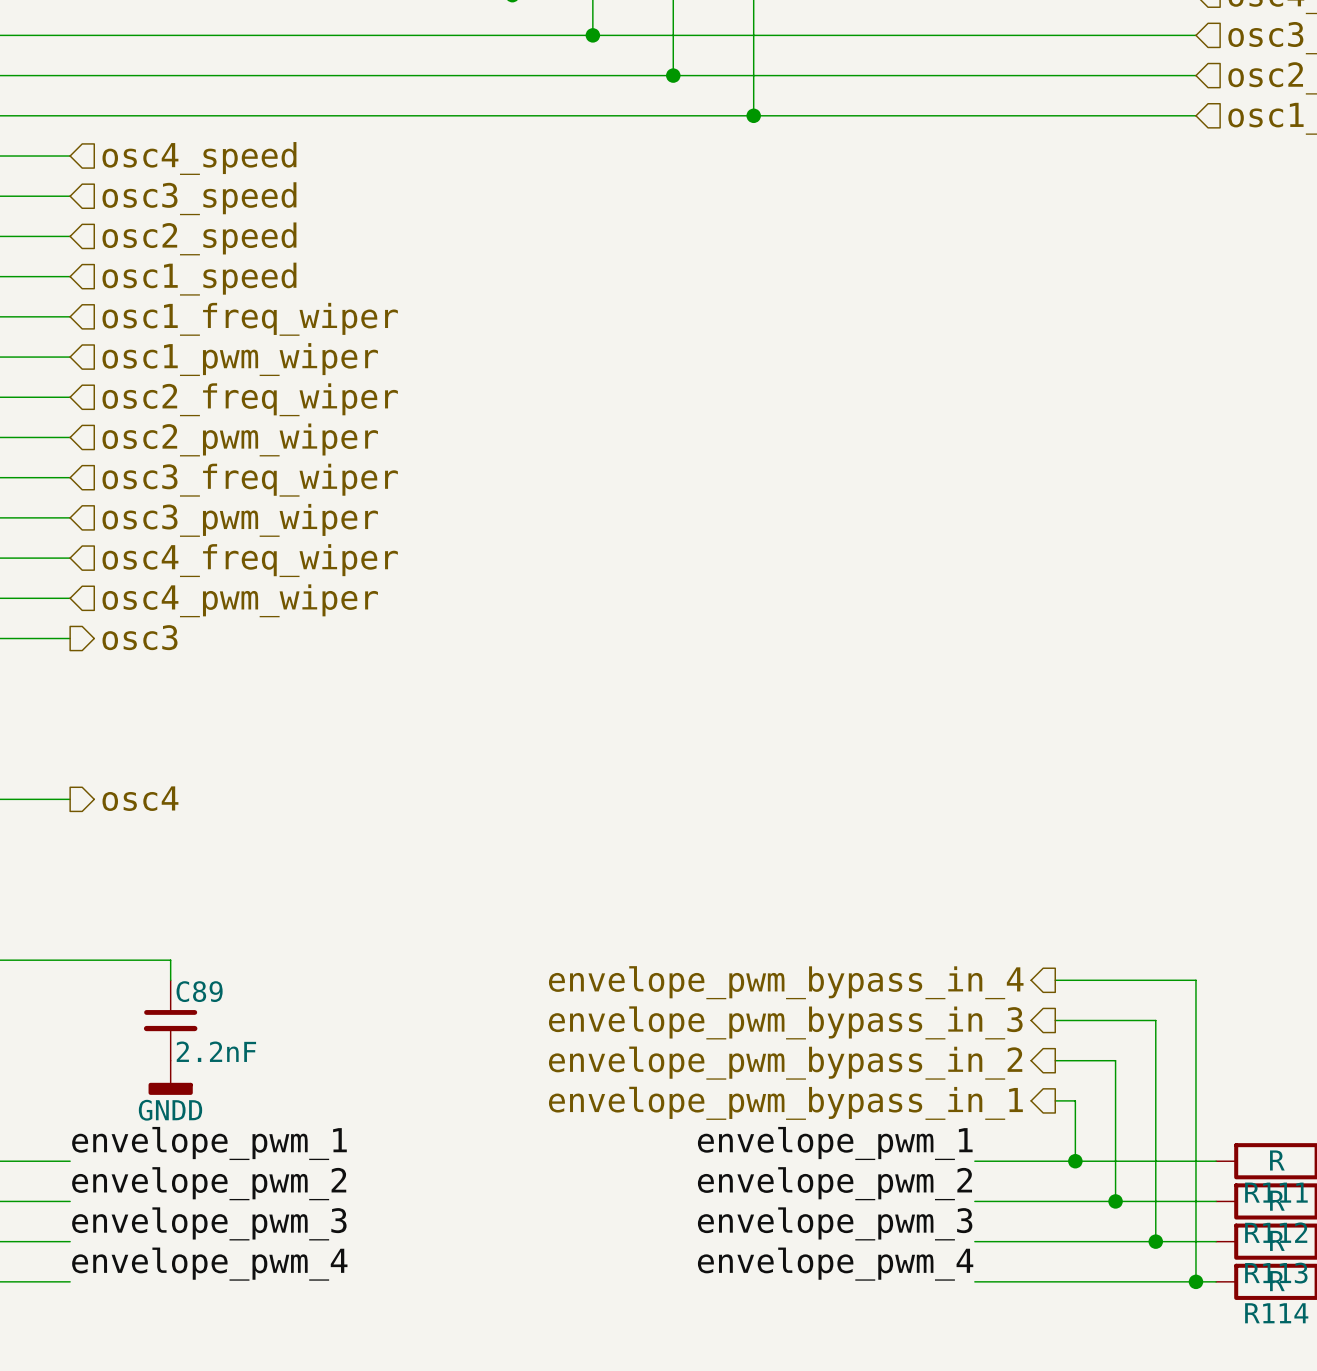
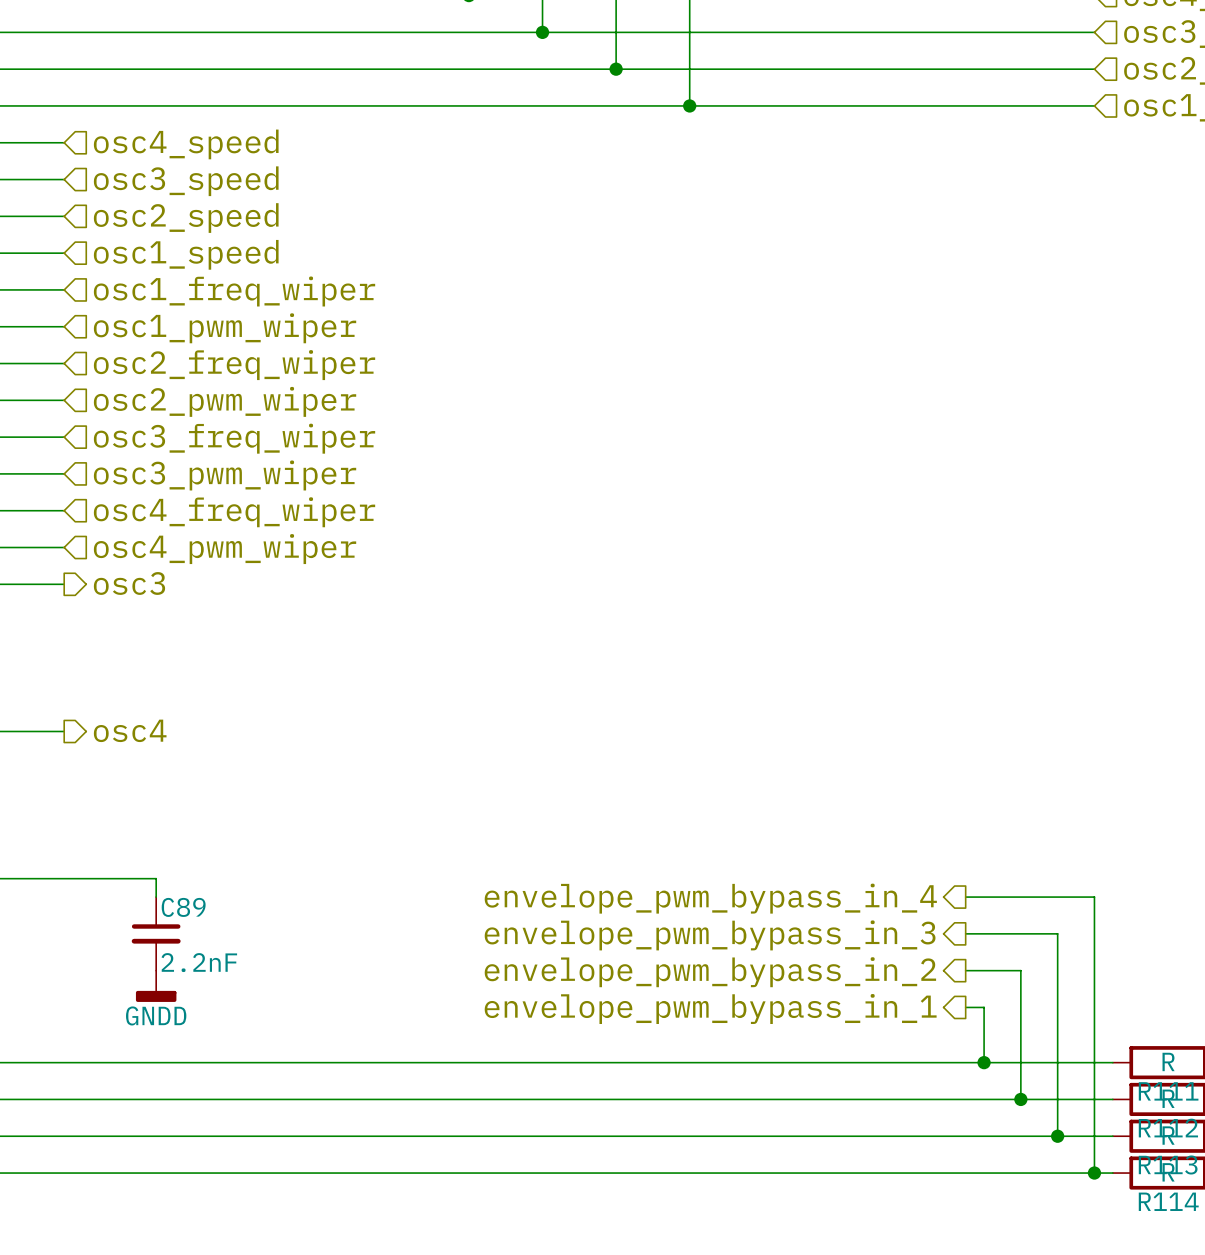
label: envelope_pwm_1 (209, 1143) -> none
label: envelope_pwm_1 (835, 1143) -> none
wire: none -> (64, 1062) (892, 1062)
label: envelope_pwm_2 (209, 1183) -> none
label: envelope_pwm_2 (834, 1183) -> none
wire: none -> (64, 1099) (892, 1099)
label: envelope_pwm_3 (209, 1223) -> none
label: envelope_pwm_3 (835, 1223) -> none
wire: none -> (64, 1136) (892, 1136)
label: envelope_pwm_4 (209, 1264) -> none
label: envelope_pwm_4 (835, 1264) -> none
wire: none -> (64, 1173) (892, 1173)

